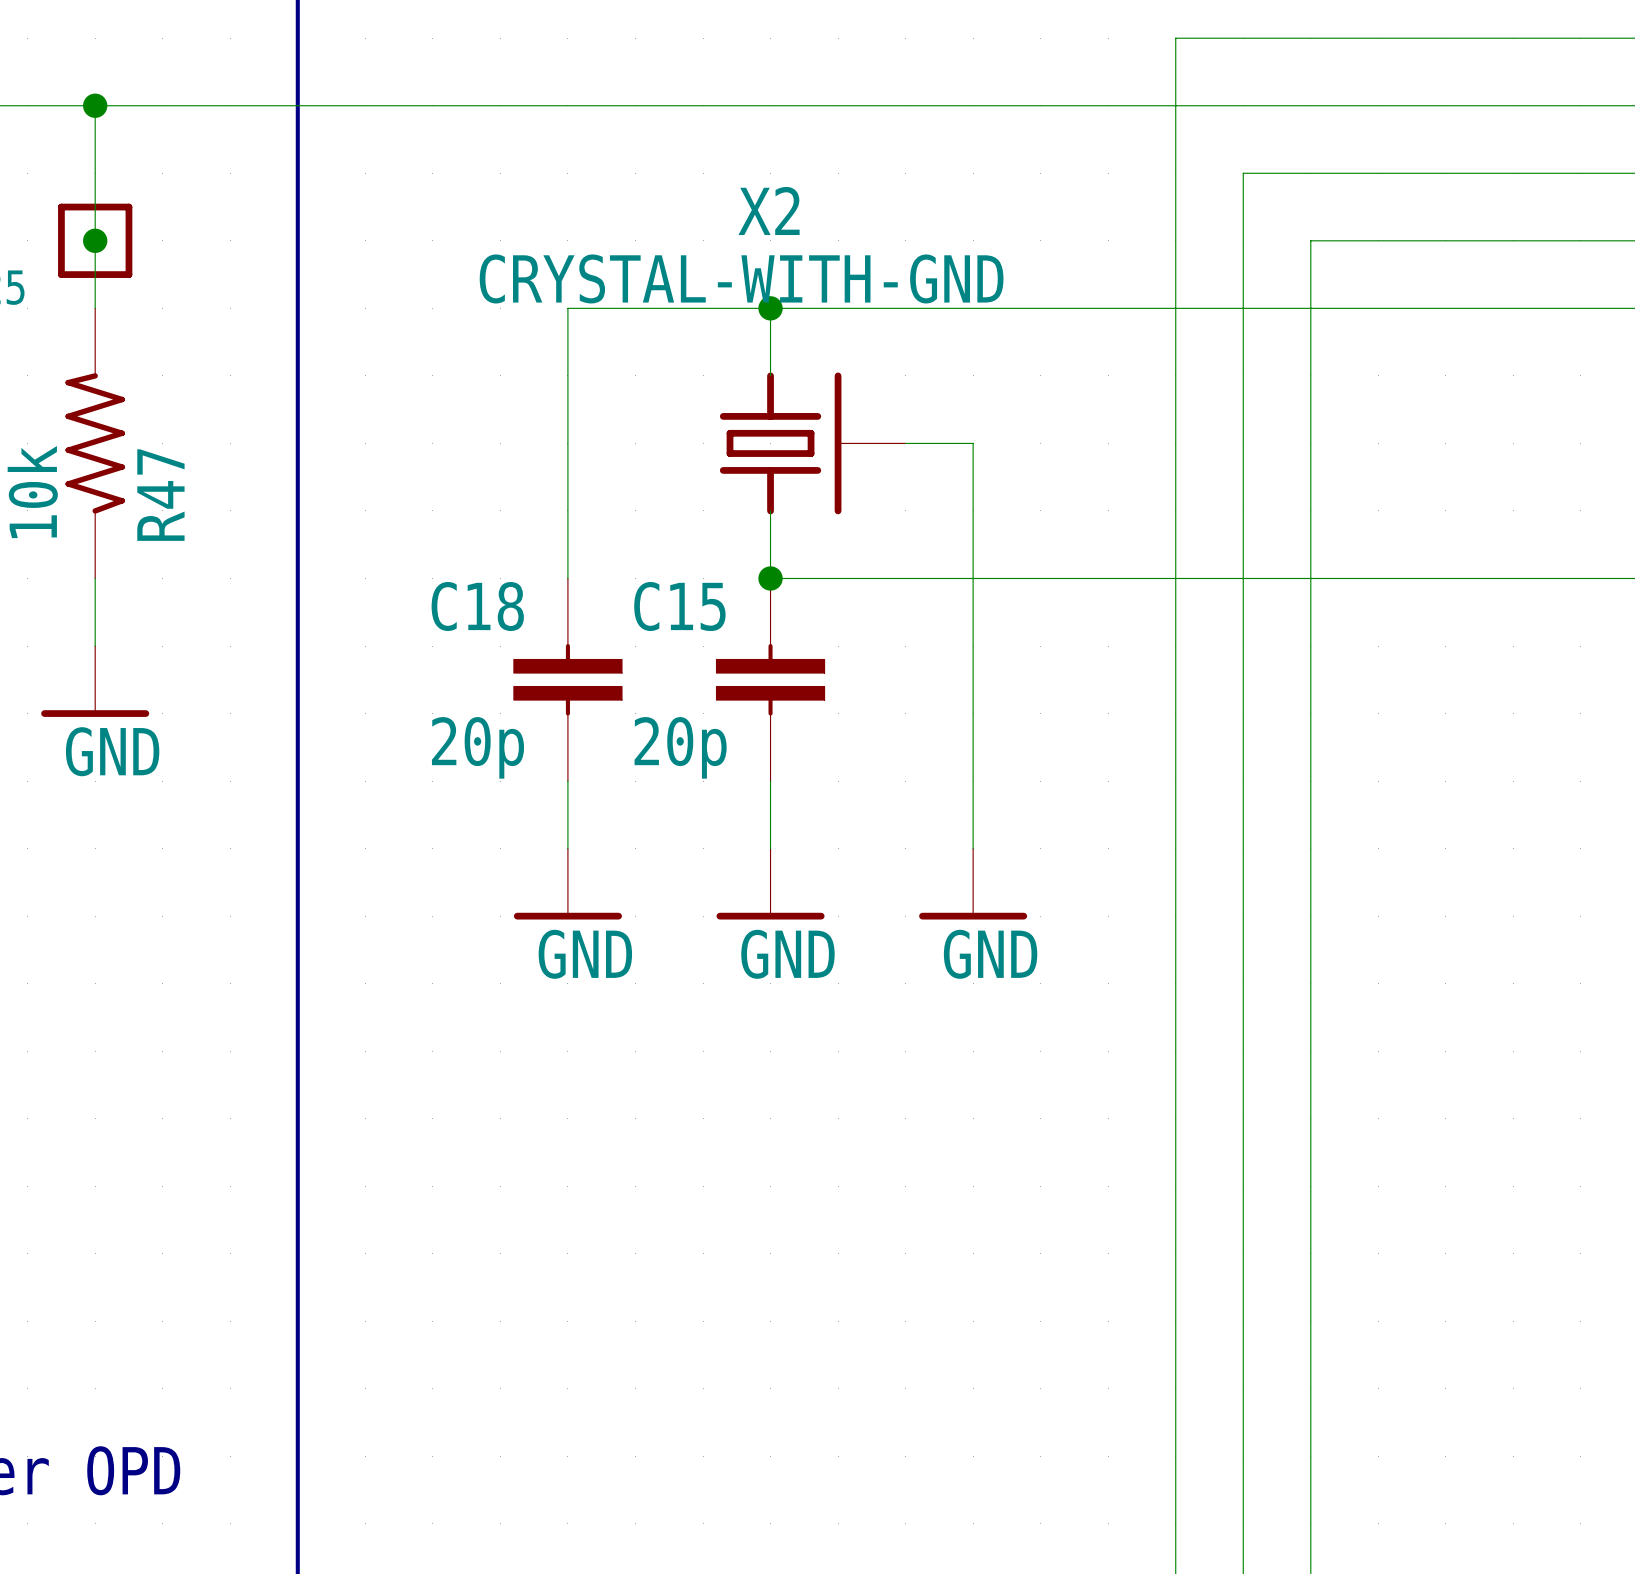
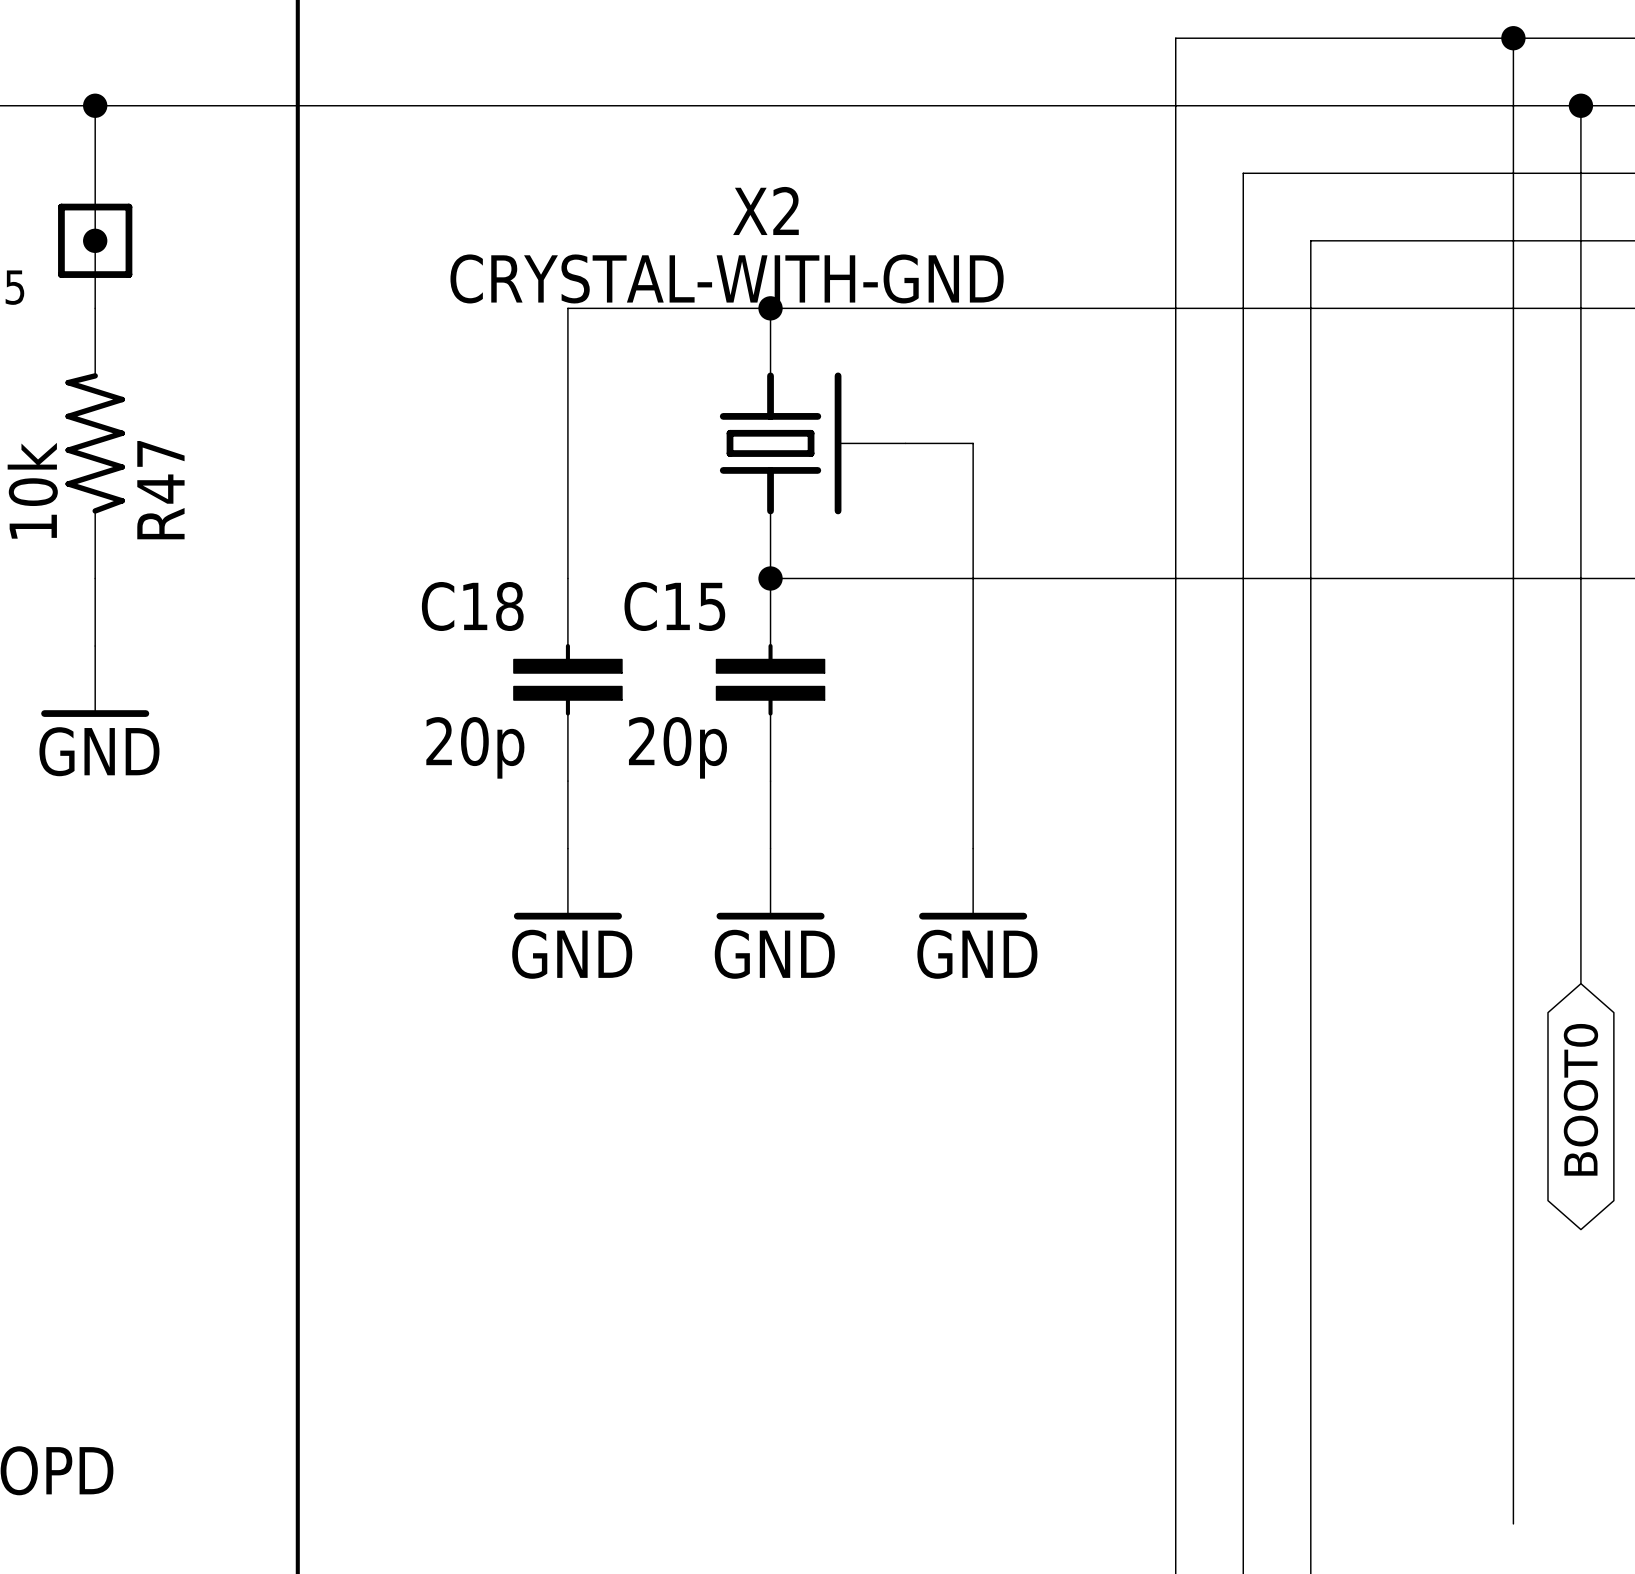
wire: none -> (1513, 38) (1513, 1523)
junction: none -> (1513, 38)
wire: none -> (1580, 105) (1580, 983)
junction: none -> (1580, 105)
global label: none -> BOOT0 (1580, 1099)

